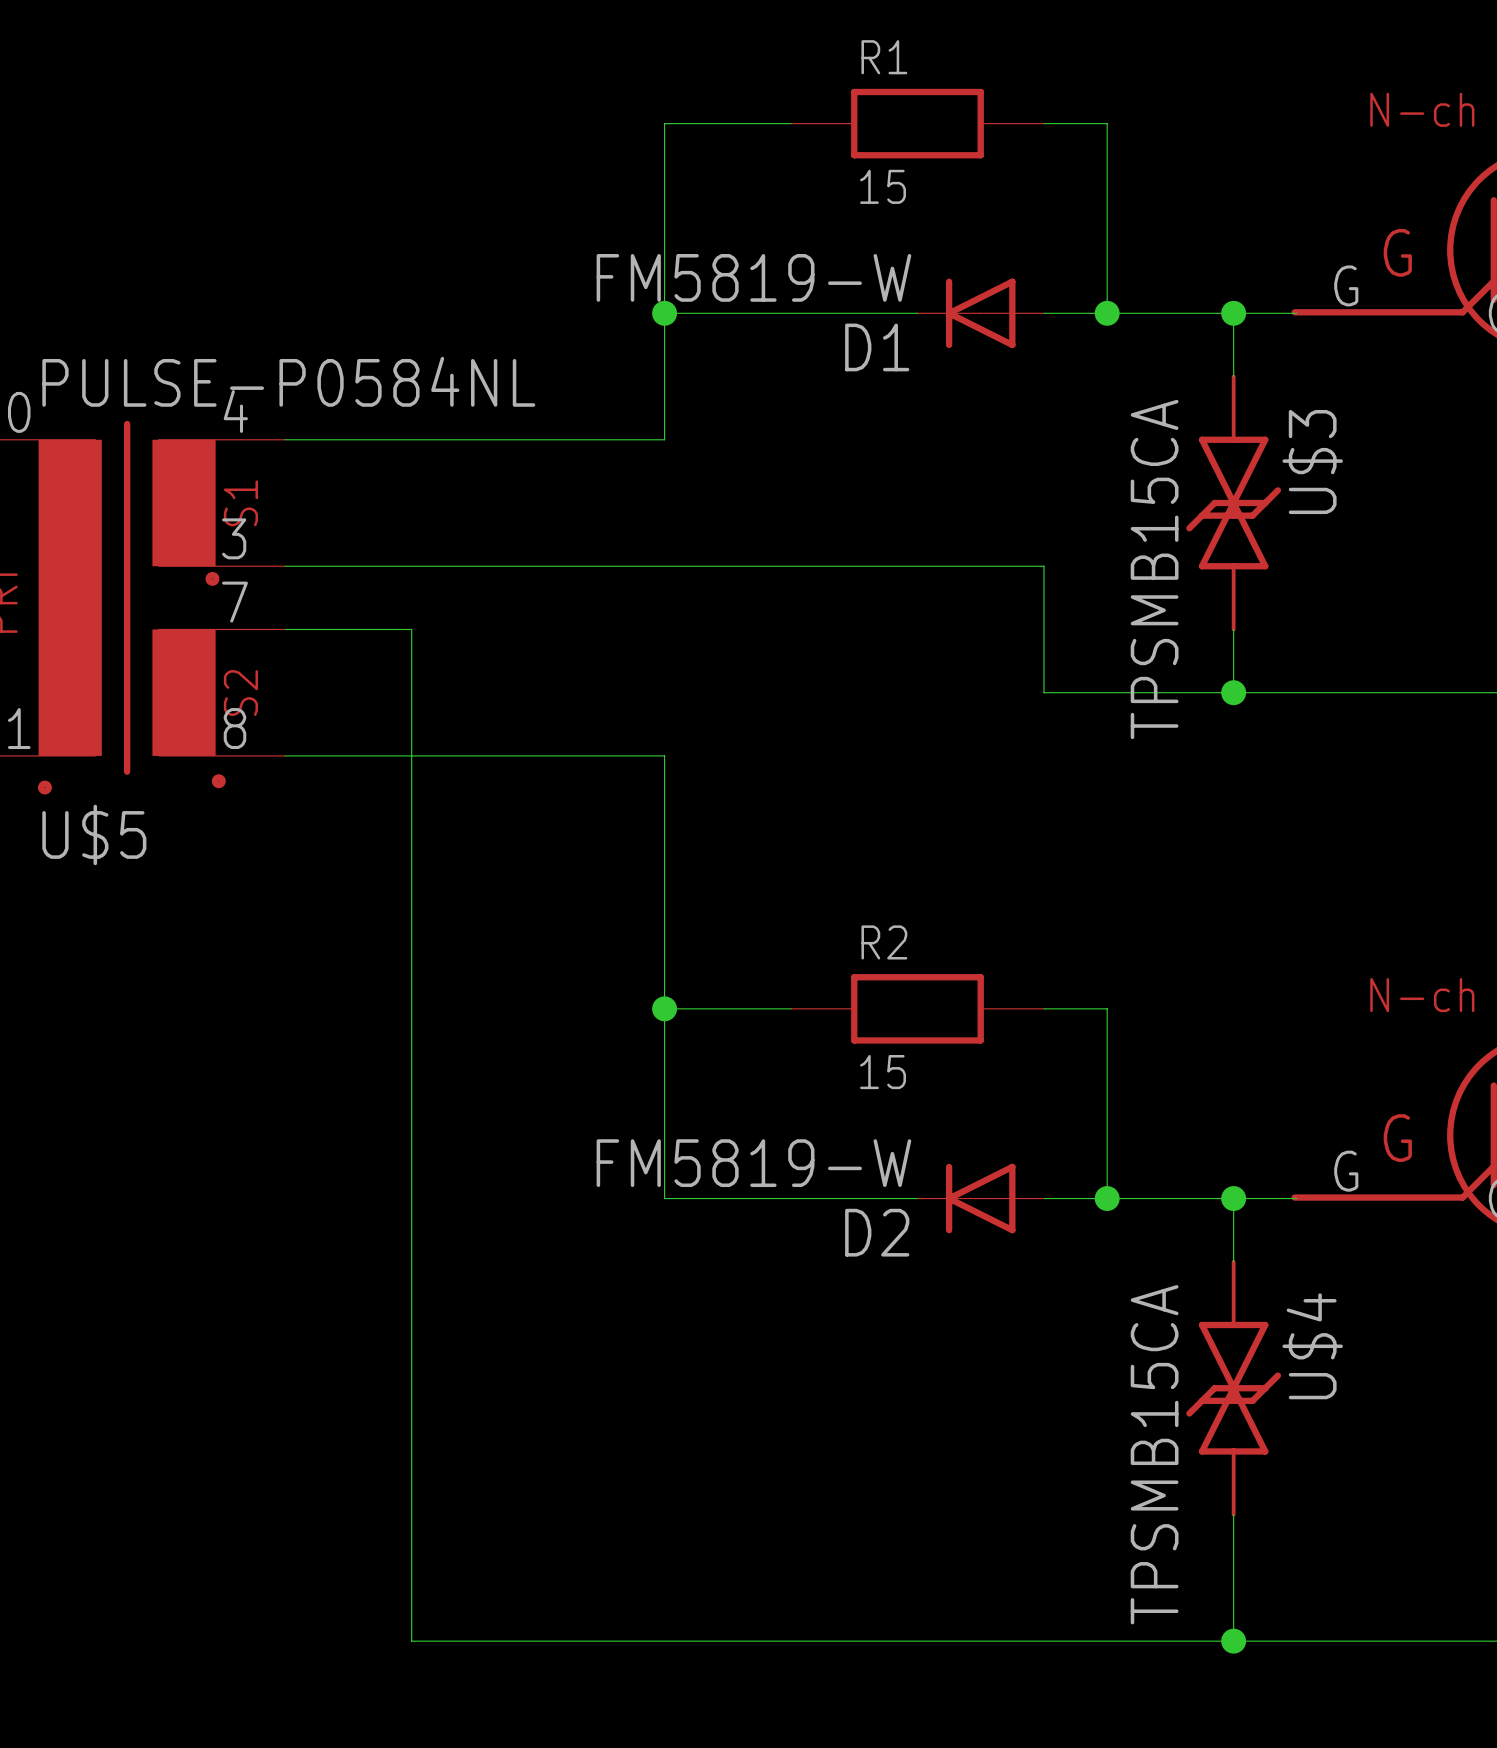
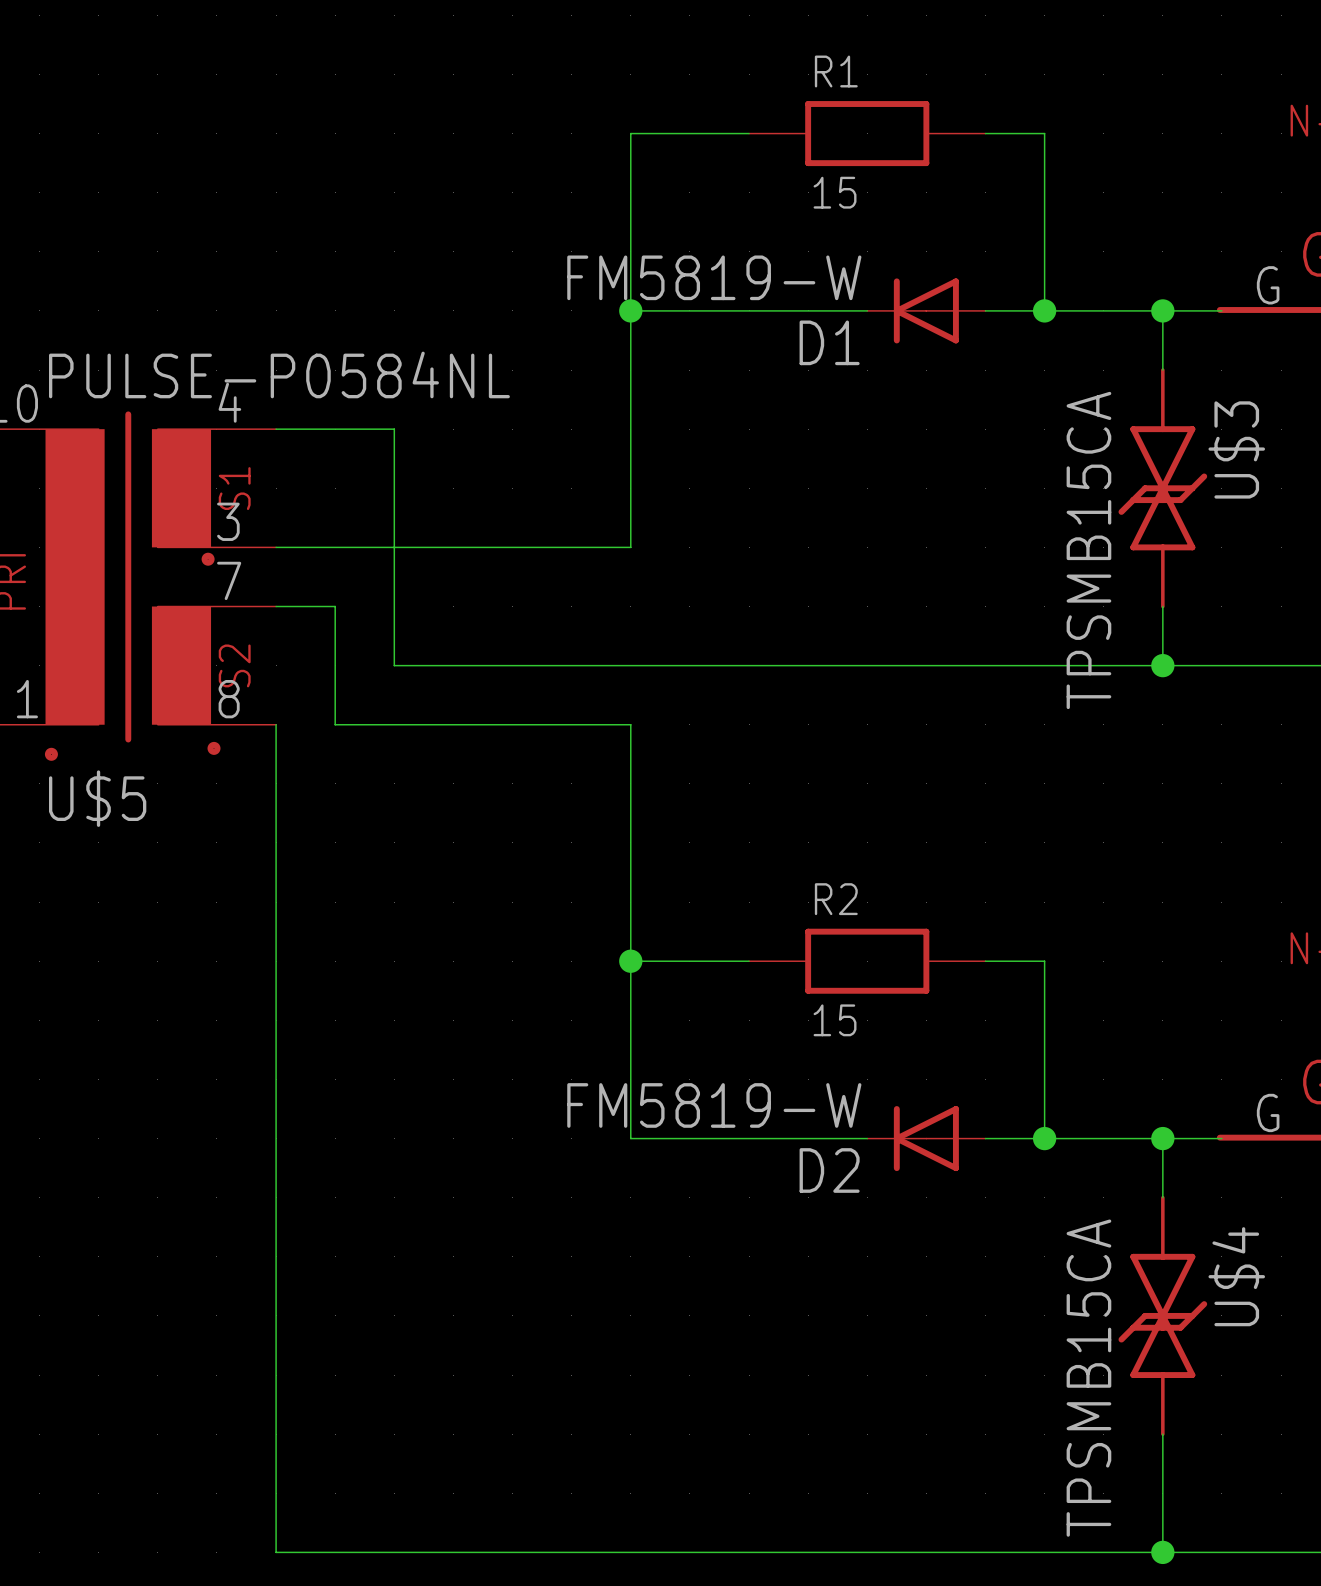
wire: (411, 439) (664, 439) -> (630, 547) (630, 429)
wire: (664, 566) (1043, 566) (1043, 692) -> (394, 665) (985, 665)
wire: (348, 629) (411, 629) -> (394, 429) (394, 606)
wire: (411, 692) (411, 1641) -> (276, 724) (276, 1552) (394, 1552)
wire: (285, 755) (348, 755) -> (335, 606) (335, 724)

